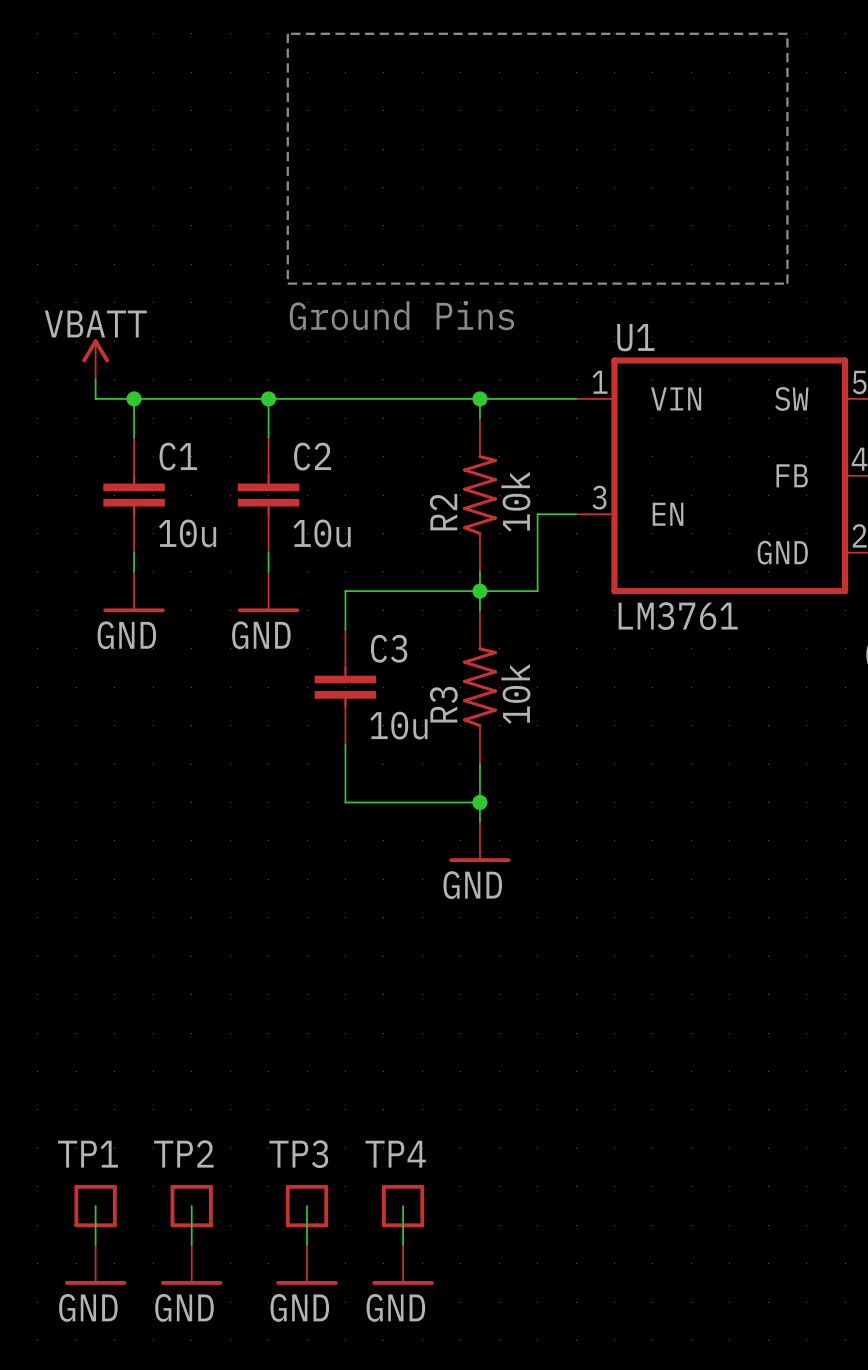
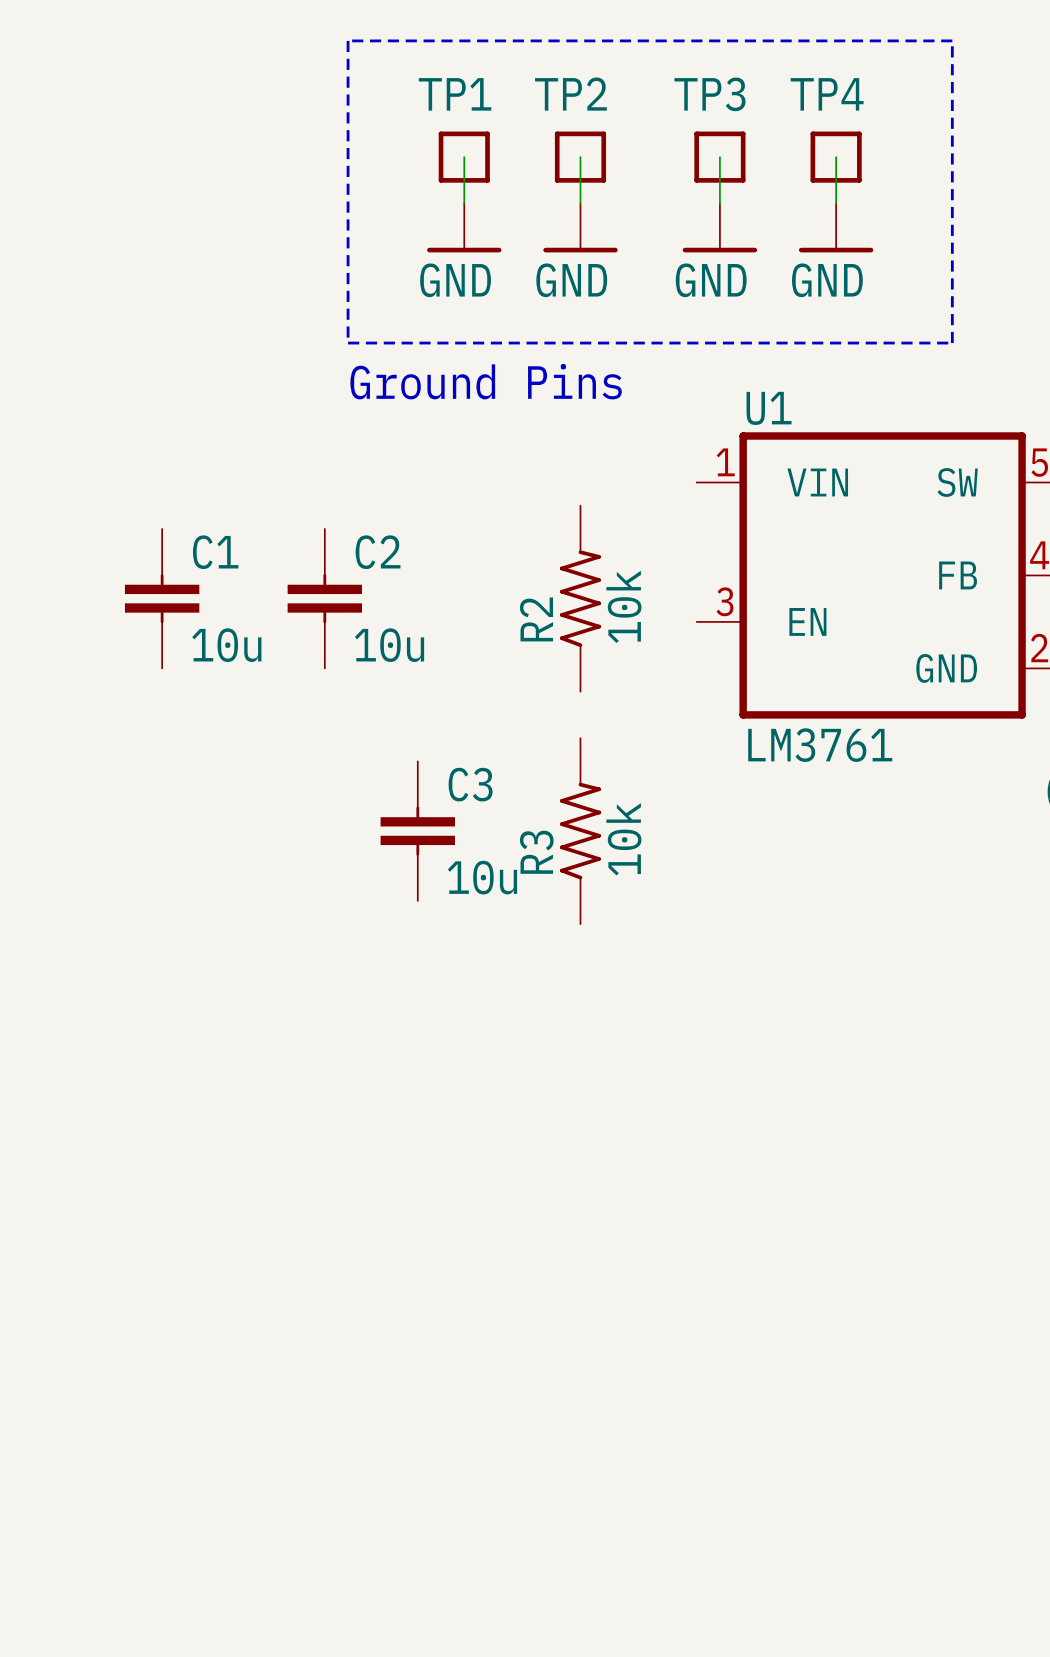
wire: none -> (580, 157) (580, 203)
wire: none -> (719, 157) (719, 203)
wire: none -> (836, 157) (836, 203)
power symbol: none -> GND (464, 227)
power symbol: none -> GND (580, 227)
power symbol: none -> GND (719, 227)
power symbol: none -> GND (836, 227)
power symbol: VBATT (95, 359) -> none
wire: (95, 379) (95, 398) (576, 398) -> none
wire: (134, 398) (134, 437) -> none
junction: (134, 398) -> none
wire: (268, 398) (268, 437) -> (464, 157) (464, 203)
junction: (268, 398) -> none
wire: (479, 398) (479, 418) -> none
junction: (479, 398) -> none
wire: (576, 514) (537, 514) (537, 591) (345, 591) (345, 629) -> none
wire: (134, 552) (134, 571) -> none
wire: (268, 552) (268, 571) -> none
wire: (479, 571) (479, 610) -> none
junction: (479, 591) -> none
power symbol: GND (134, 592) -> none
power symbol: GND (268, 592) -> none
wire: (345, 744) (345, 802) (479, 802) -> none
wire: (479, 764) (479, 821) -> none
junction: (479, 802) -> none
power symbol: GND (479, 841) -> none
wire: (95, 1206) (95, 1244) -> none
TP1 position: (95, 1206) -> (464, 157)
wire: (191, 1206) (191, 1244) -> none
TP2 position: (191, 1206) -> (580, 157)
wire: (307, 1206) (307, 1244) -> none
TP3 position: (307, 1206) -> (719, 157)
wire: (403, 1206) (403, 1244) -> none
TP4 position: (403, 1206) -> (836, 157)
power symbol: GND (95, 1264) -> none
power symbol: GND (191, 1264) -> none
power symbol: GND (307, 1264) -> none
power symbol: GND (403, 1264) -> none

